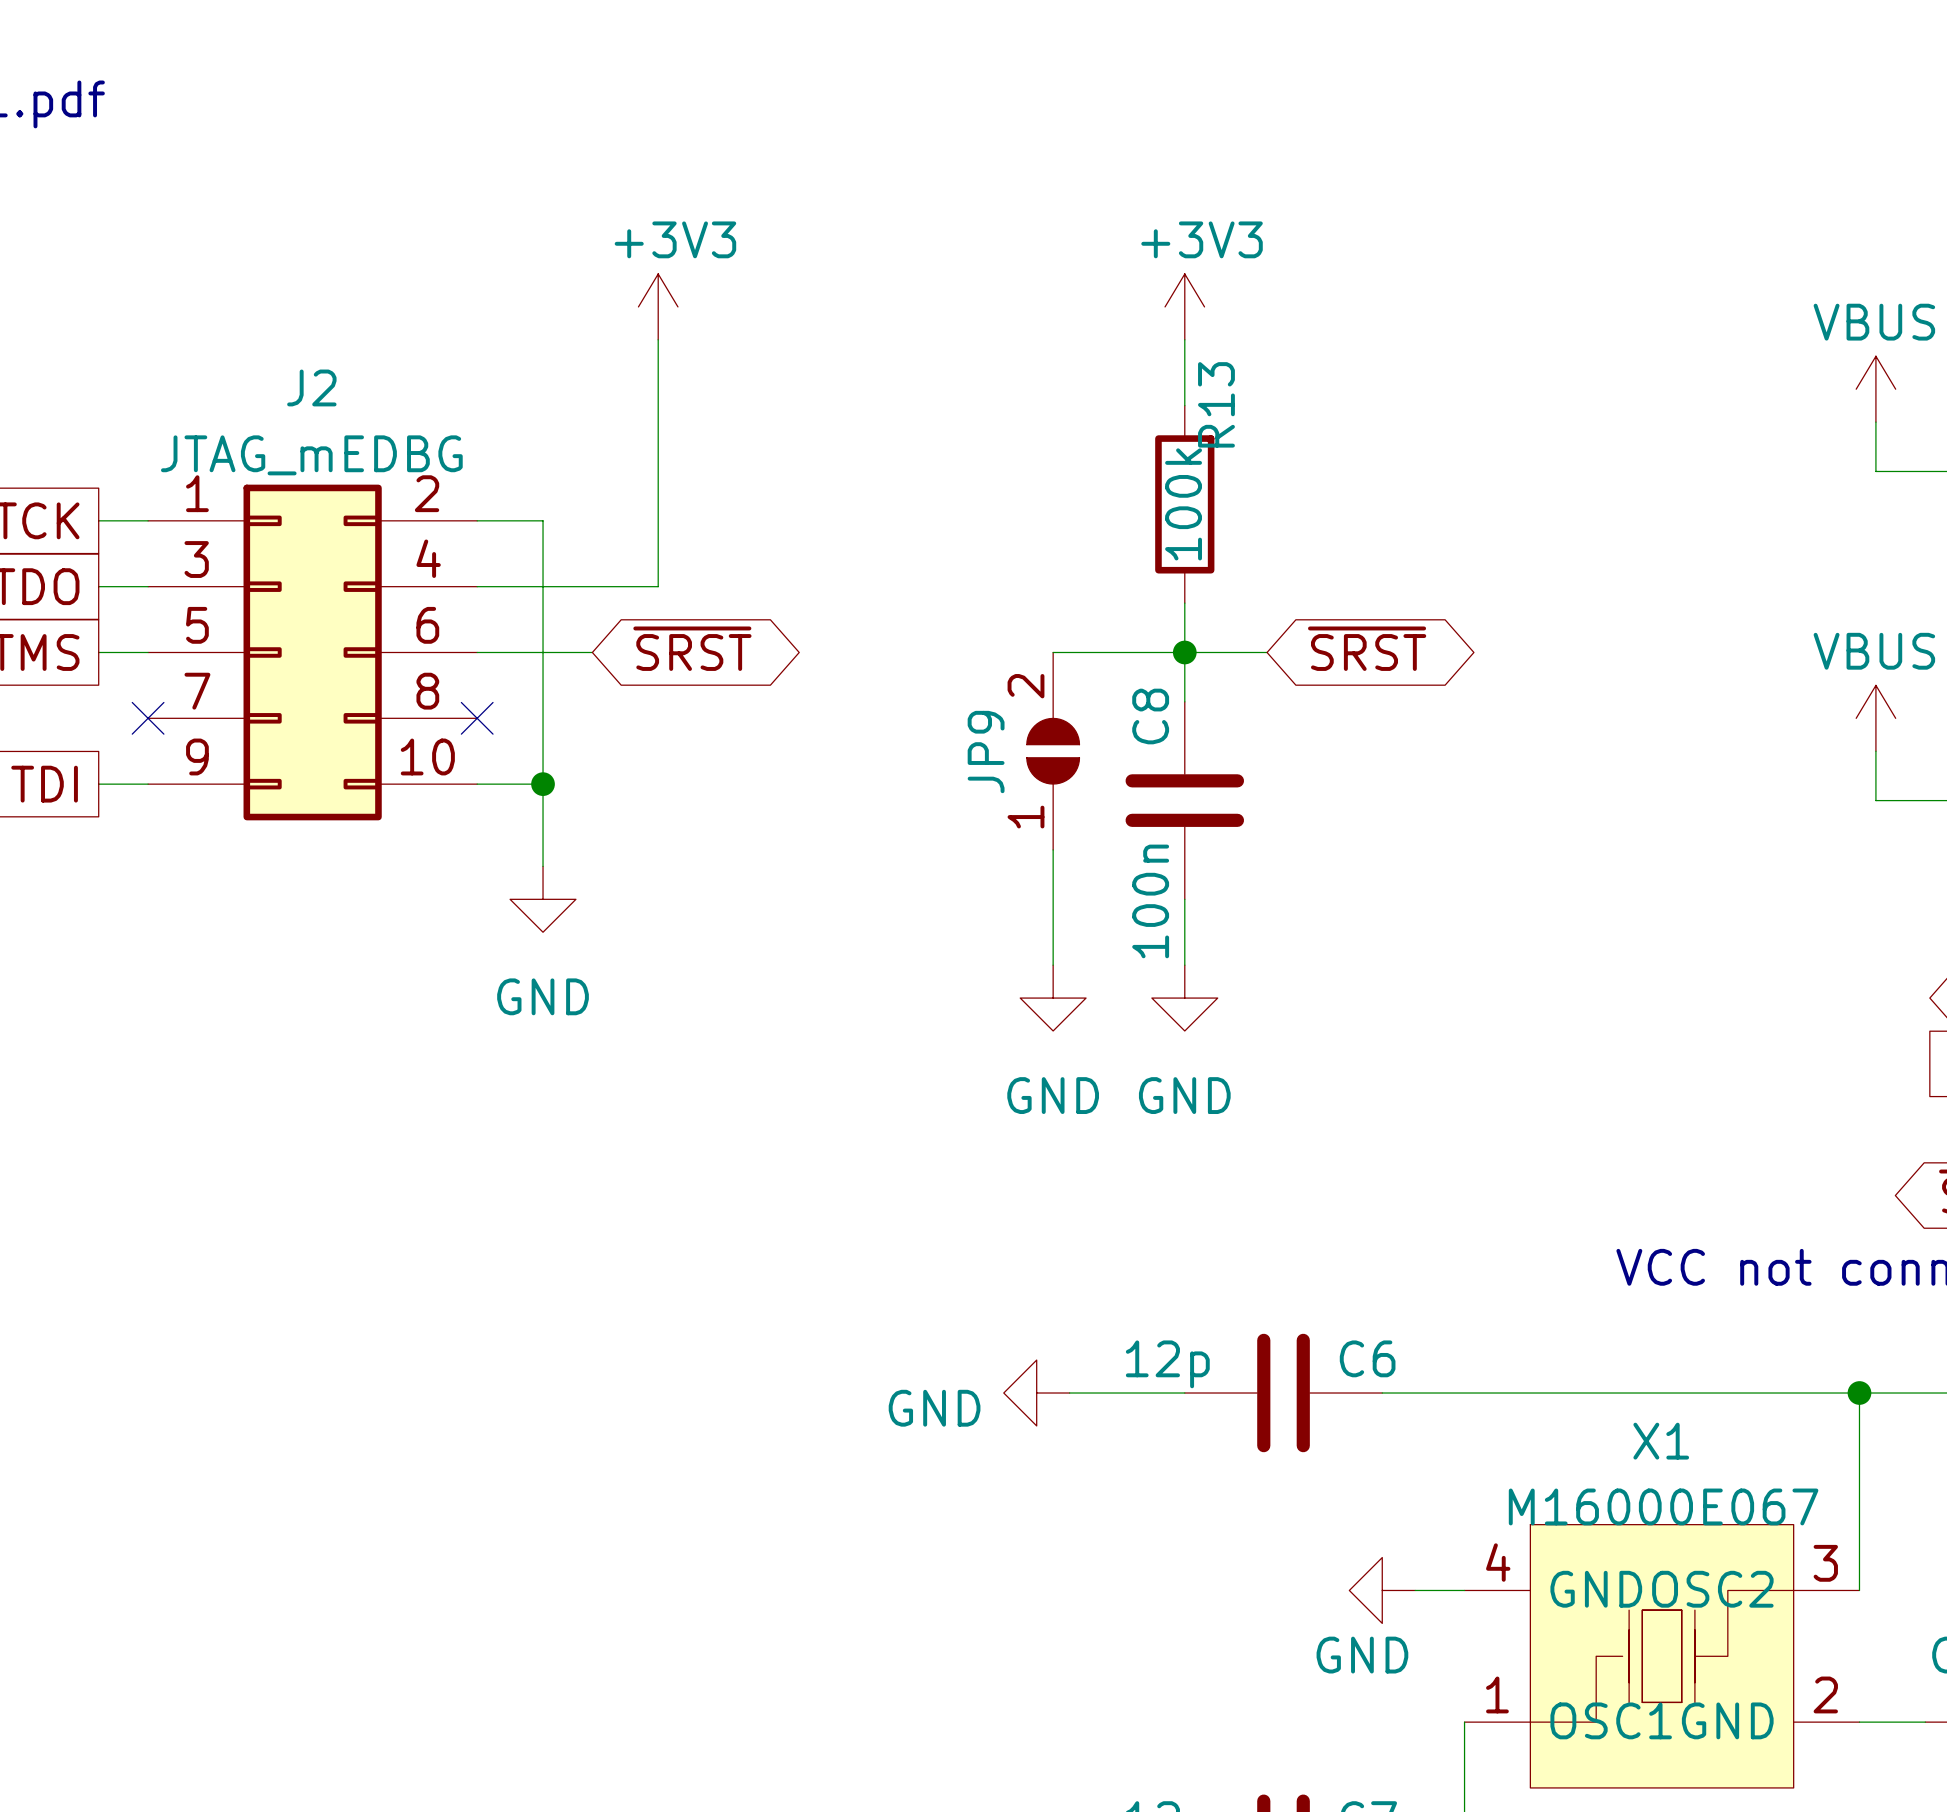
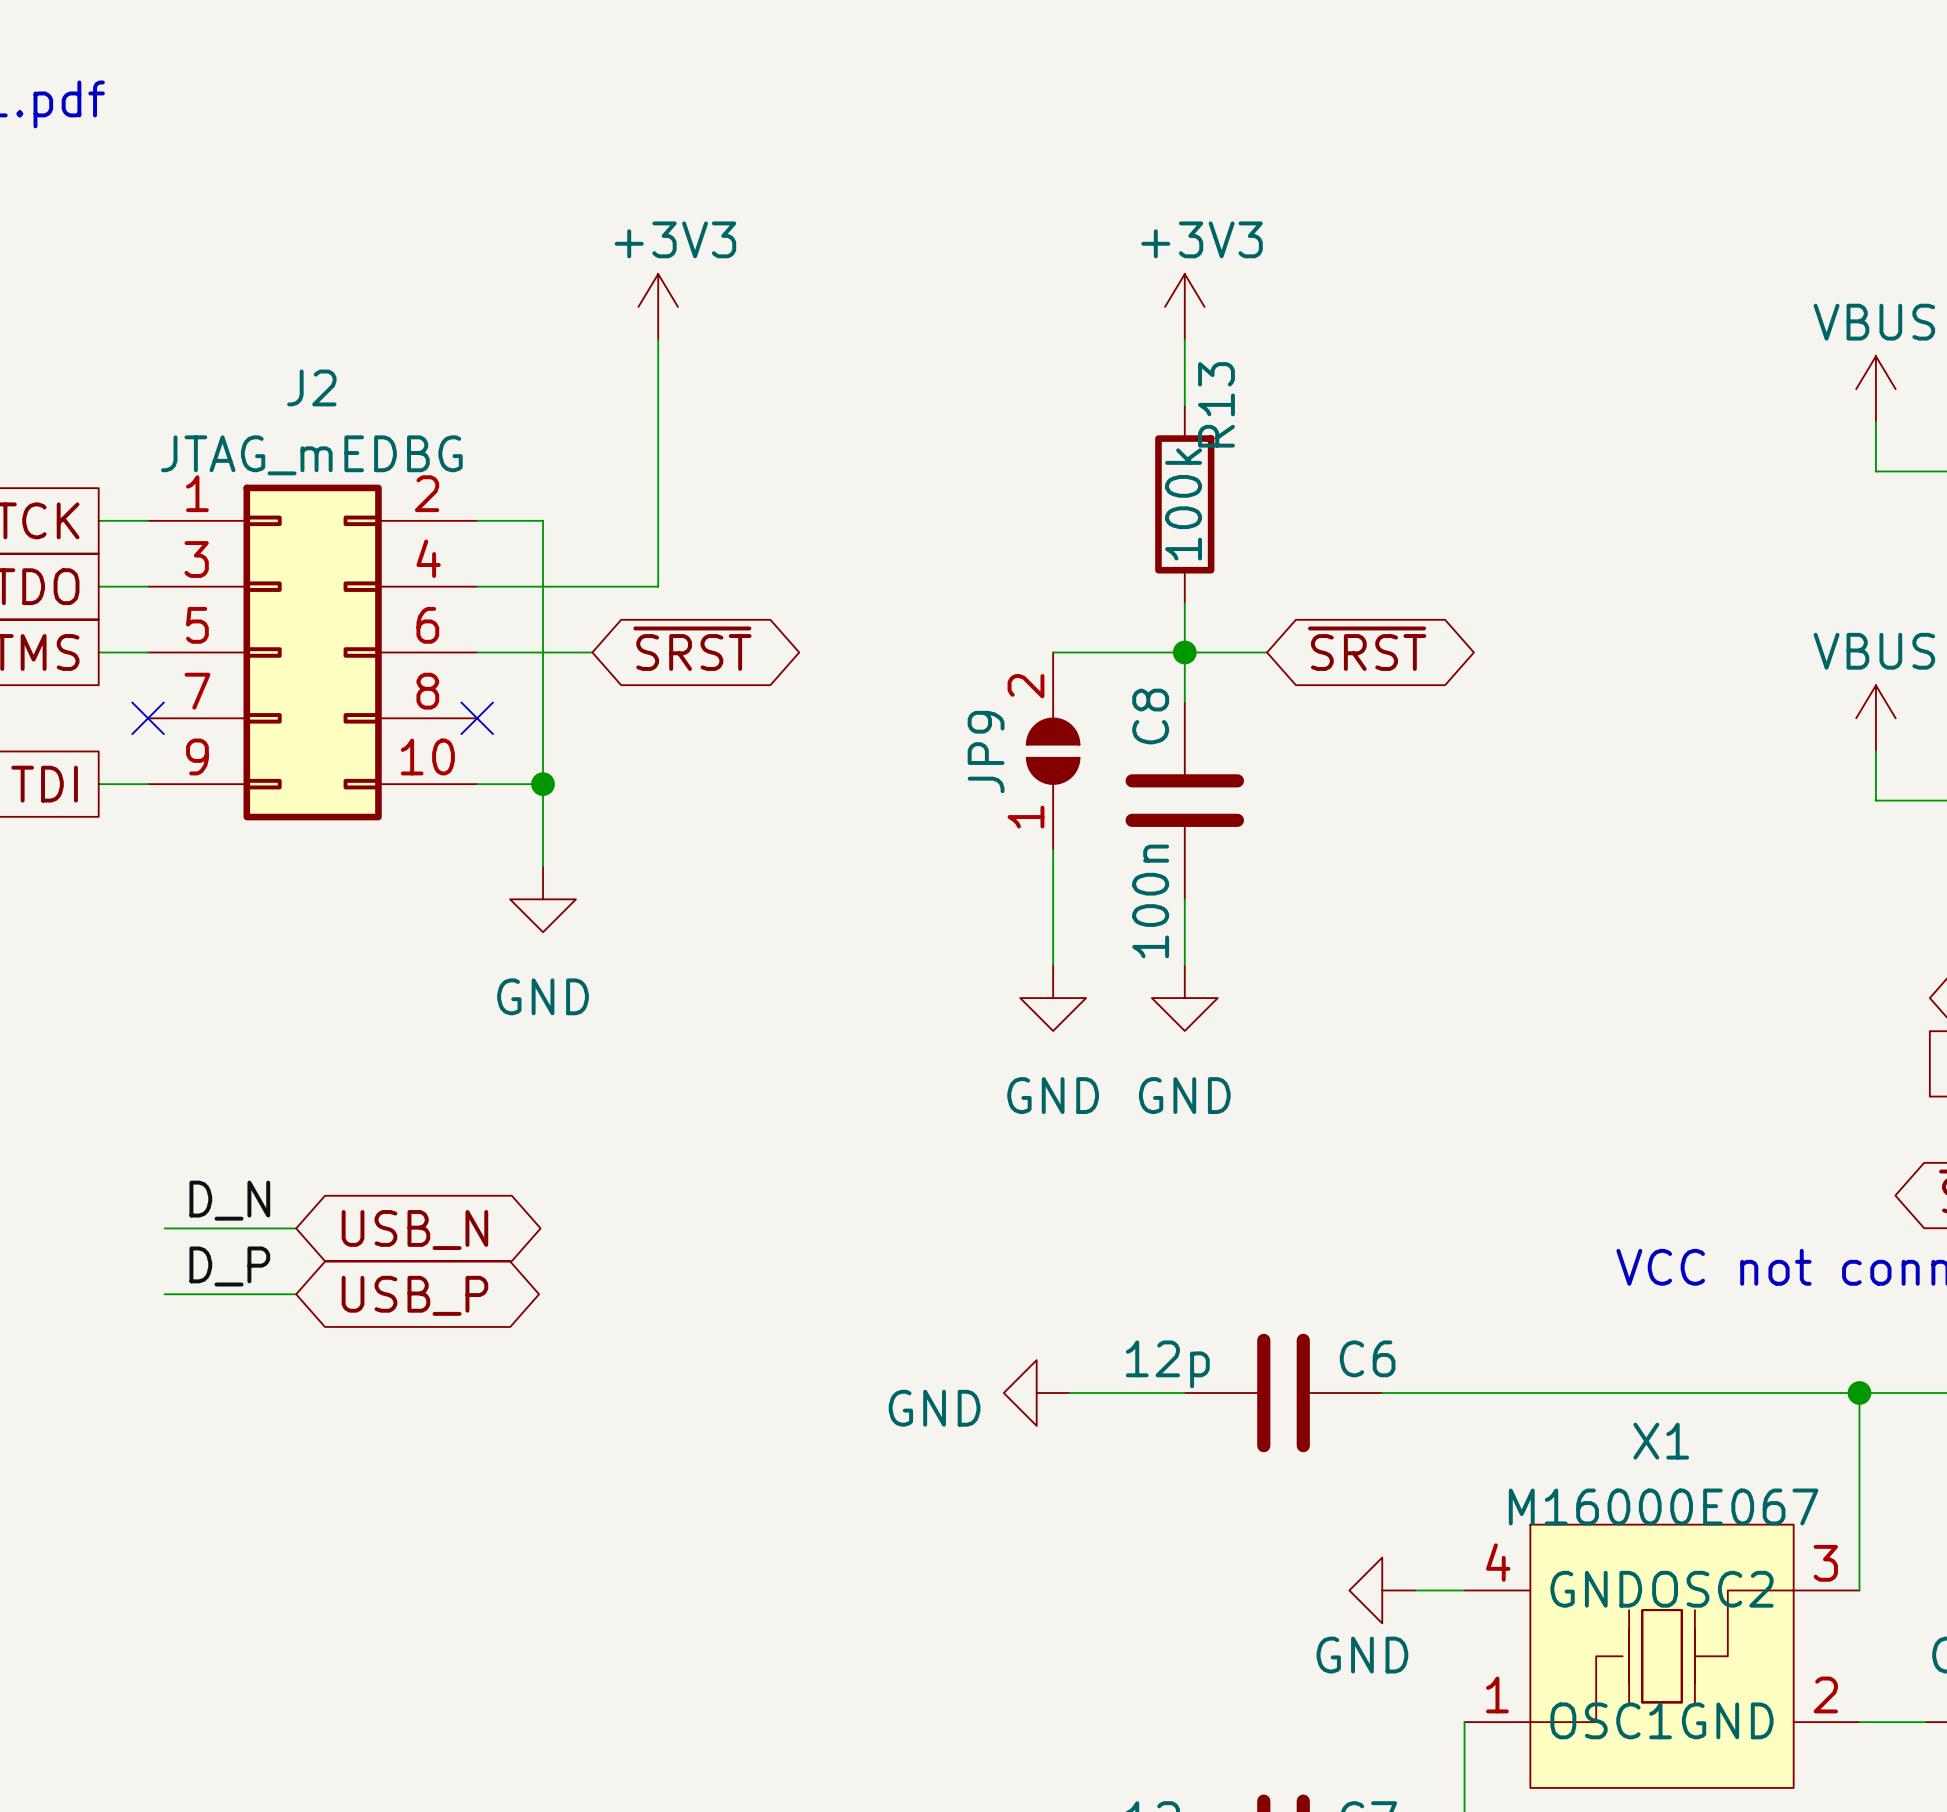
label: none -> D_N (229, 1200)
wire: none -> (164, 1228) (296, 1228)
global label: none -> USB_N (414, 1230)
label: none -> D_P (229, 1266)
wire: none -> (164, 1294) (296, 1294)
global label: none -> USB_P (414, 1295)

